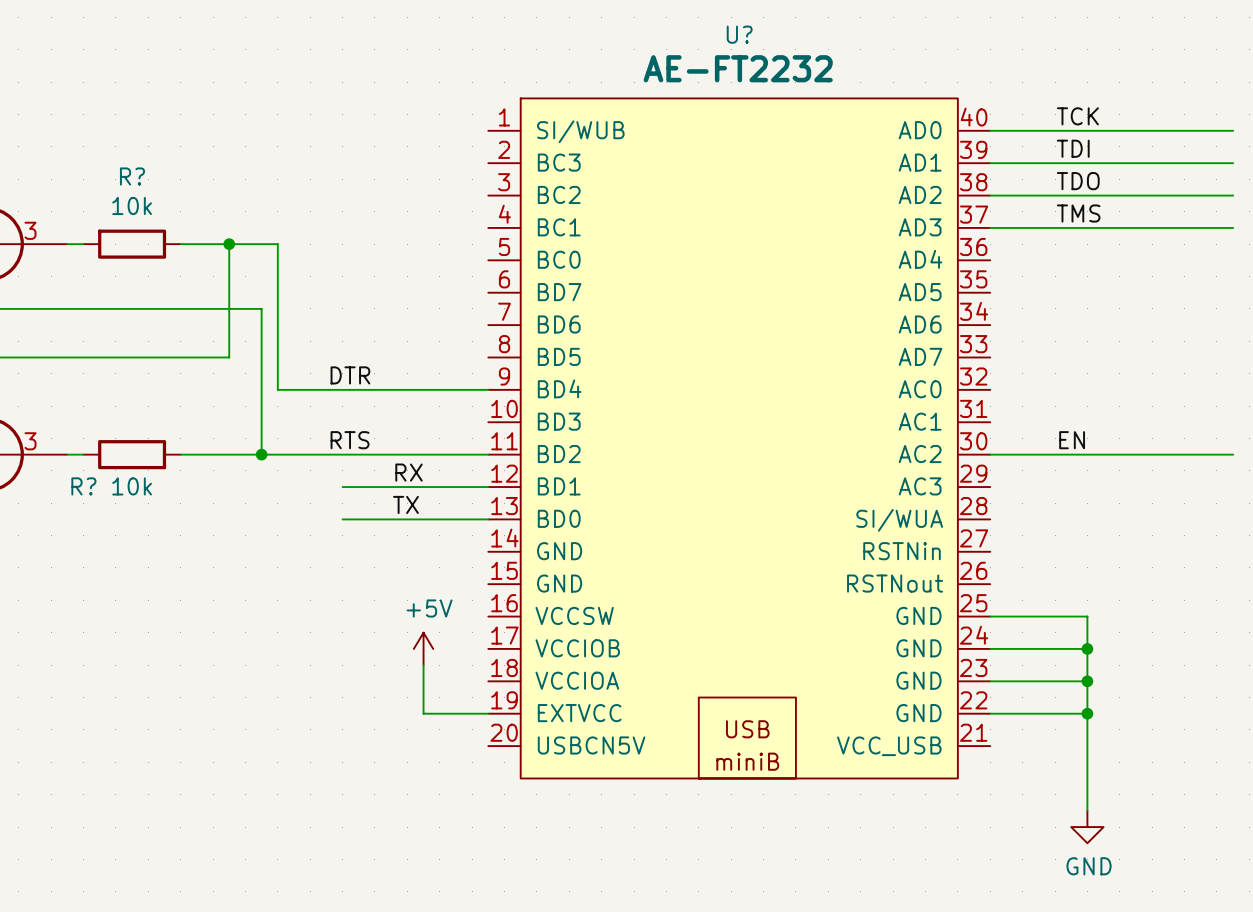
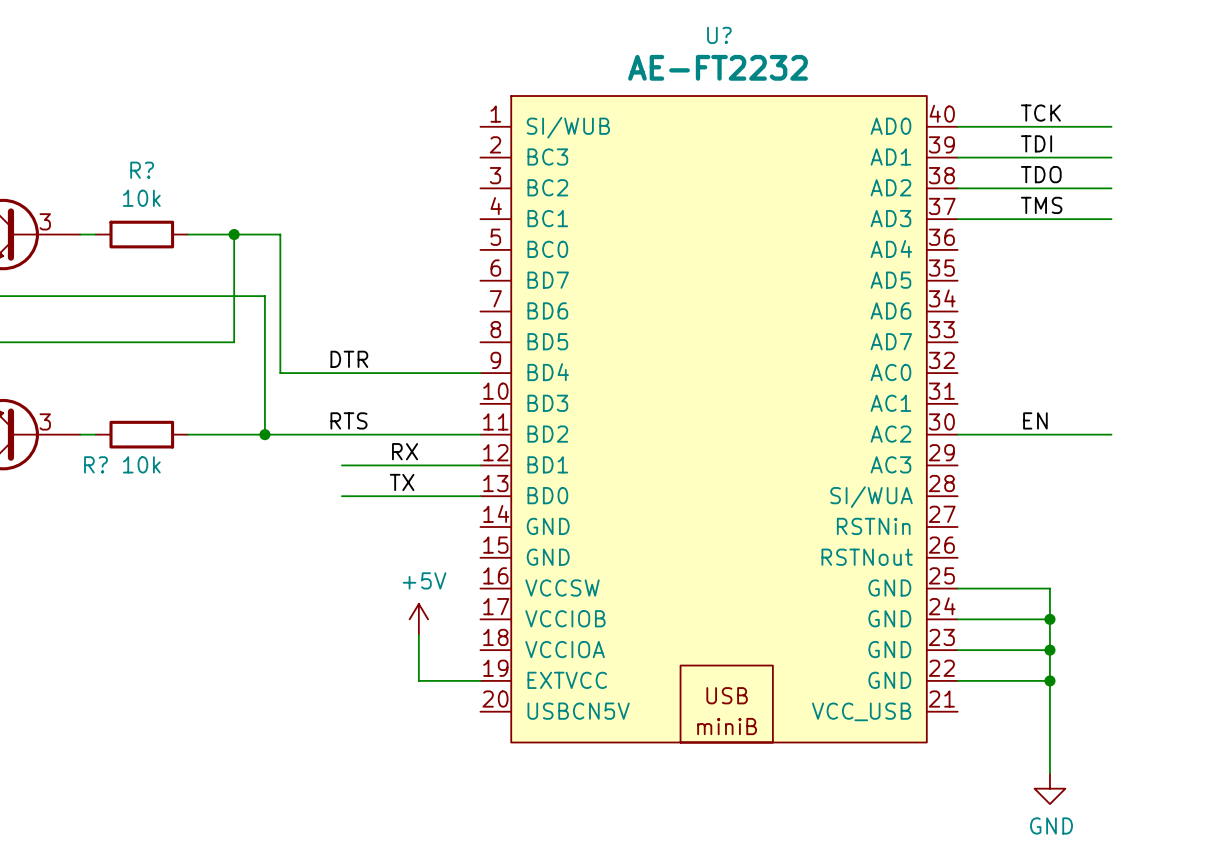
wire: (1152, 130) (1233, 130) -> none
wire: (1152, 163) (1233, 163) -> none
wire: (1152, 195) (1233, 195) -> none
wire: (1152, 227) (1233, 227) -> none
wire: (1152, 454) (1233, 454) -> none

